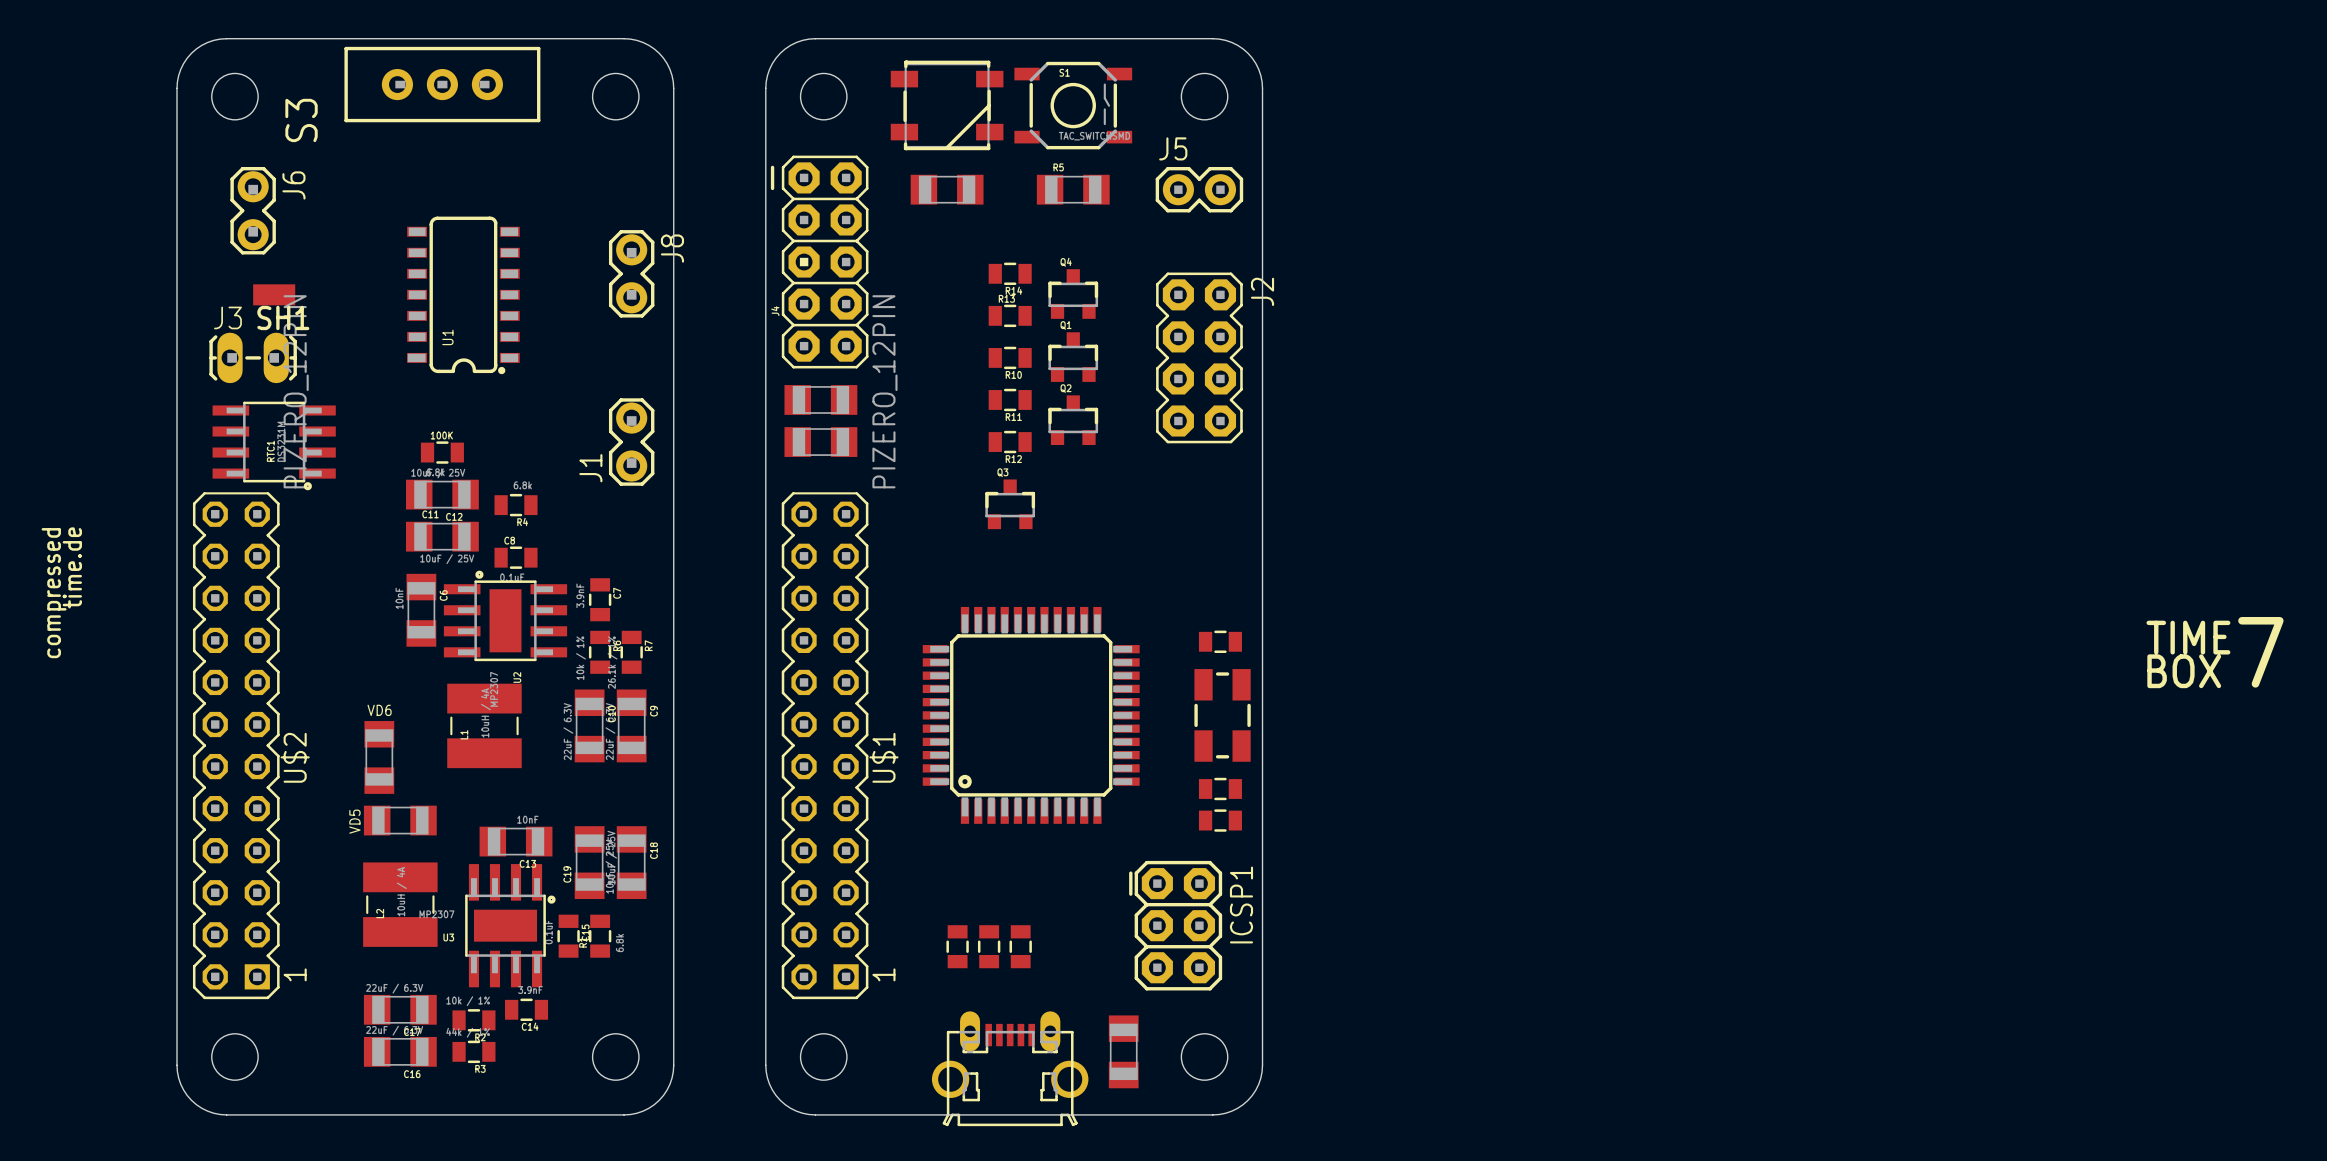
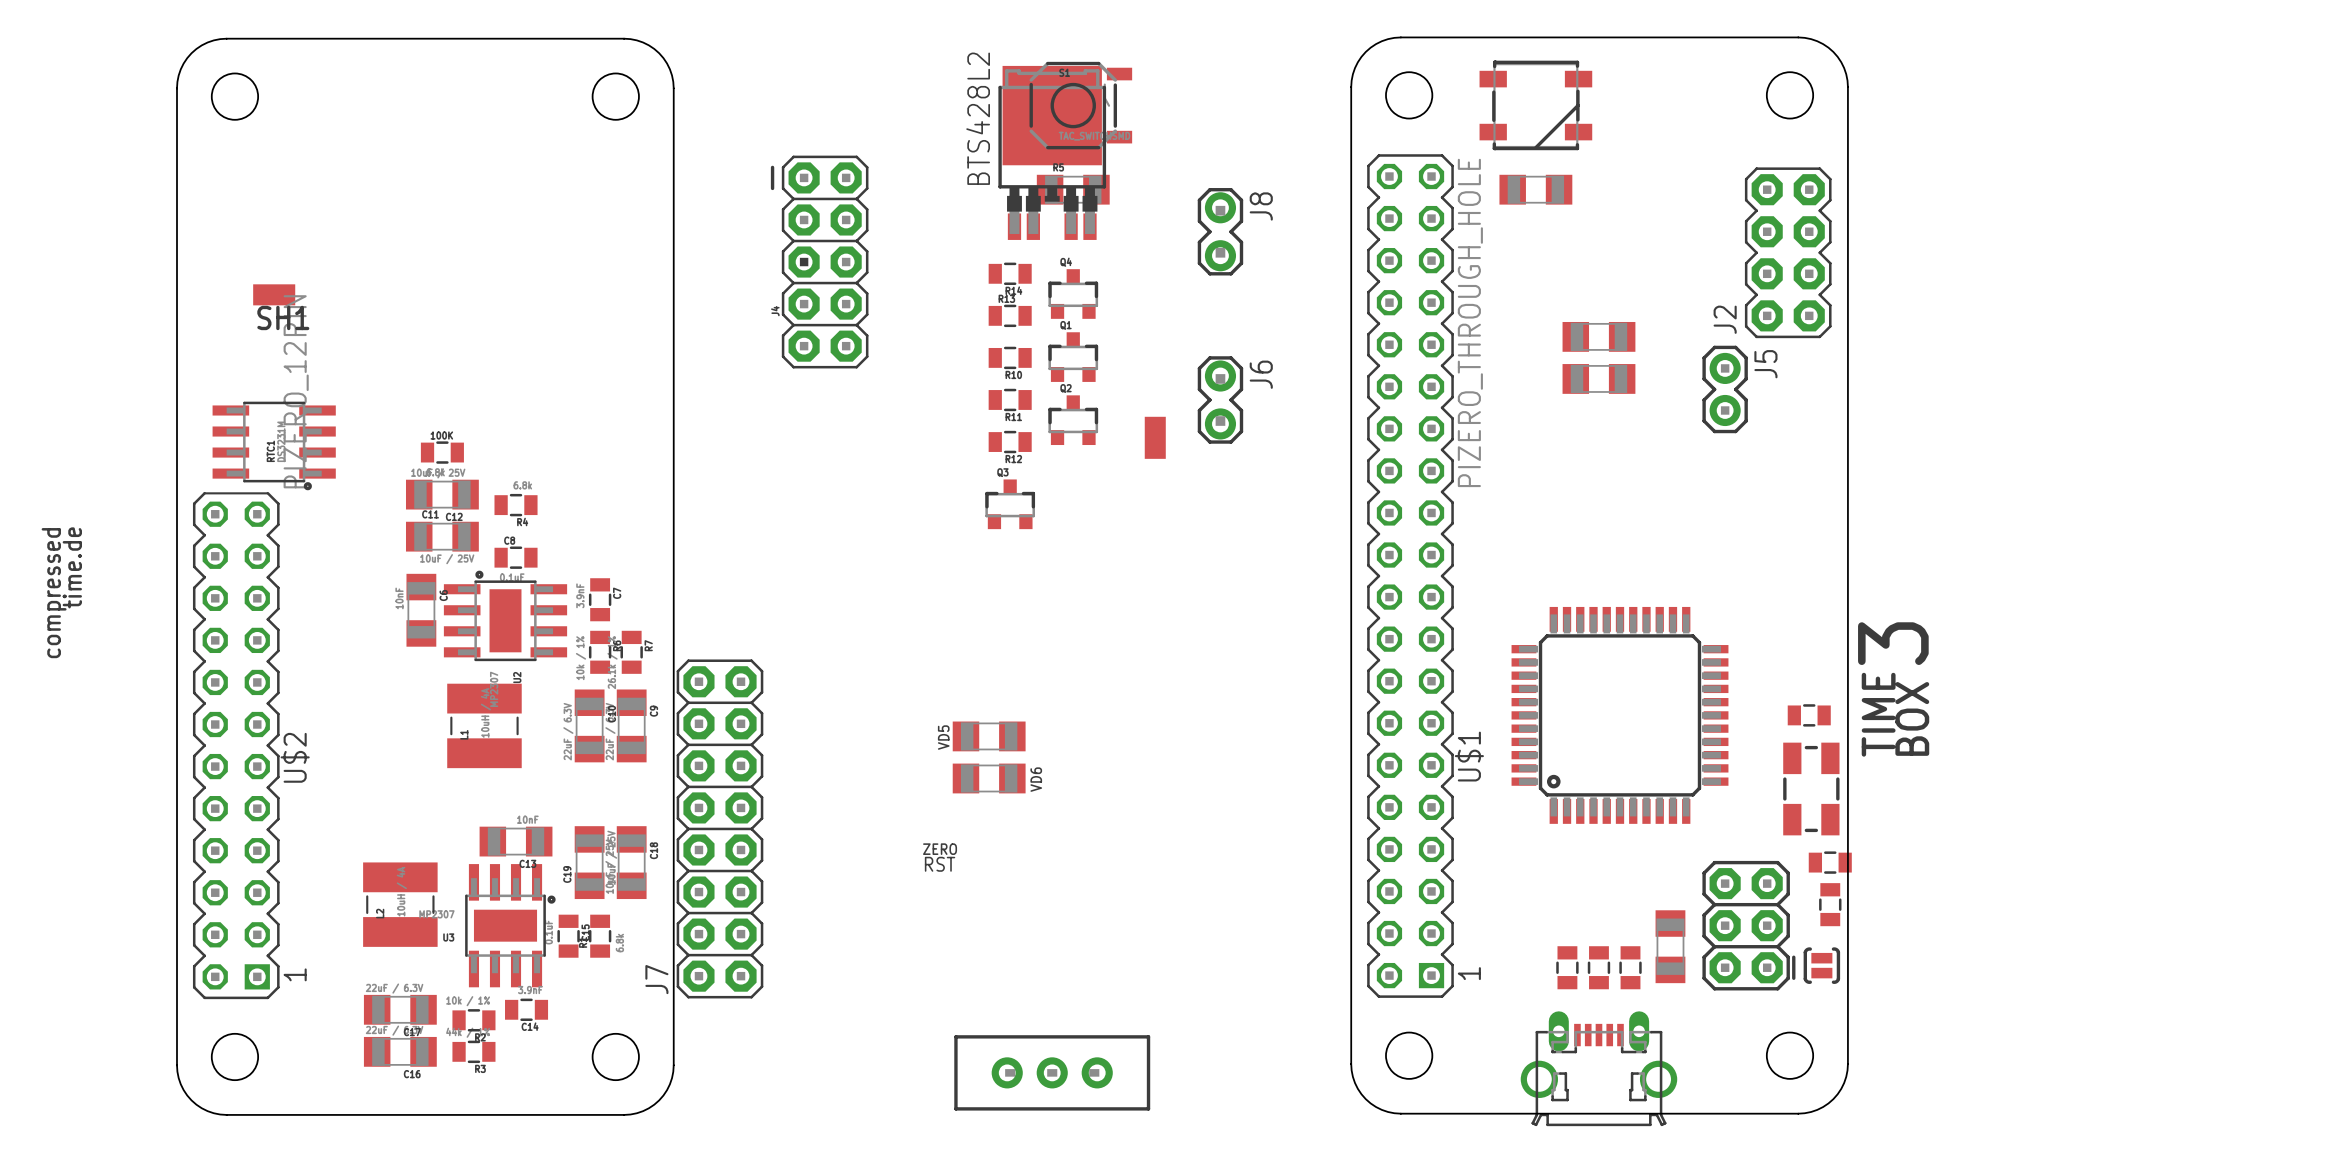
U$1 footprint: [765, 38, 1263, 1115] -> [1351, 37, 1848, 1114]
S3: (442, 84) -> none
part: (947, 105) -> none
part: none -> (1535, 105)
BTS428L2: none -> (1052, 152)
part: (947, 189) -> none
J5 rotation: 0° (1199, 189) -> 90° clockwise (1725, 389)
J5 position: (1199, 189) -> (1725, 389)
part: none -> (1535, 189)
J6 position: (253, 210) -> (1220, 399)
J8 position: (631, 273) -> (1220, 231)
J2 name position: J2 (1262, 291) -> J2 (1725, 319)
U1: (463, 295) -> none
part: none -> (1598, 336)
J3: (253, 357) -> none
J2 position: (1199, 357) -> (1788, 252)
part: none -> (1598, 378)
U$1 value: PIZERO_12PIN (884, 391) -> PIZERO_THROUGH_HOLE (1470, 322)
part: (820, 399) -> none
part: none -> (1155, 437)
J1: (631, 442) -> none
part: (820, 442) -> none
text rotation: 0° (2188, 637) -> 90° counterclockwise (1878, 714)
text position: TIME (2188, 637) -> TIME (1878, 714)
part: (1220, 641) -> none
text: none -> 3 (1893, 643)
text: 7 (2260, 652) -> none
text rotation: 0° (2184, 671) -> 90° counterclockwise (1912, 718)
text position: BOX (2184, 671) -> BOX (1912, 718)
part: (1031, 715) -> none
part: (1222, 715) -> none
part: none -> (1620, 715)
part: none -> (1809, 715)
VD6 rotation: 0° (379, 757) -> 90° clockwise (989, 778)
VD6 position: (379, 757) -> (989, 778)
part: (1220, 789) -> none
part: none -> (1811, 789)
VD5 position: (400, 820) -> (989, 736)
part: (1220, 820) -> none
J7: none -> (719, 828)
text: none -> ZERO (940, 849)
part: none -> (1830, 862)
text: none -> RST (940, 864)
part: none -> (1830, 904)
ICSP1: (1175, 925) -> none
part: none -> (1748, 925)
part: (957, 946) -> none
part: (989, 946) -> none
part: (1020, 946) -> none
part: none -> (1670, 946)
part: none -> (1821, 965)
part: none -> (1567, 967)
part: none -> (1598, 967)
part: none -> (1630, 967)
part: (1123, 1051) -> none
part: (1010, 1068) -> none
part: none -> (1598, 1068)
part: none -> (1052, 1072)

